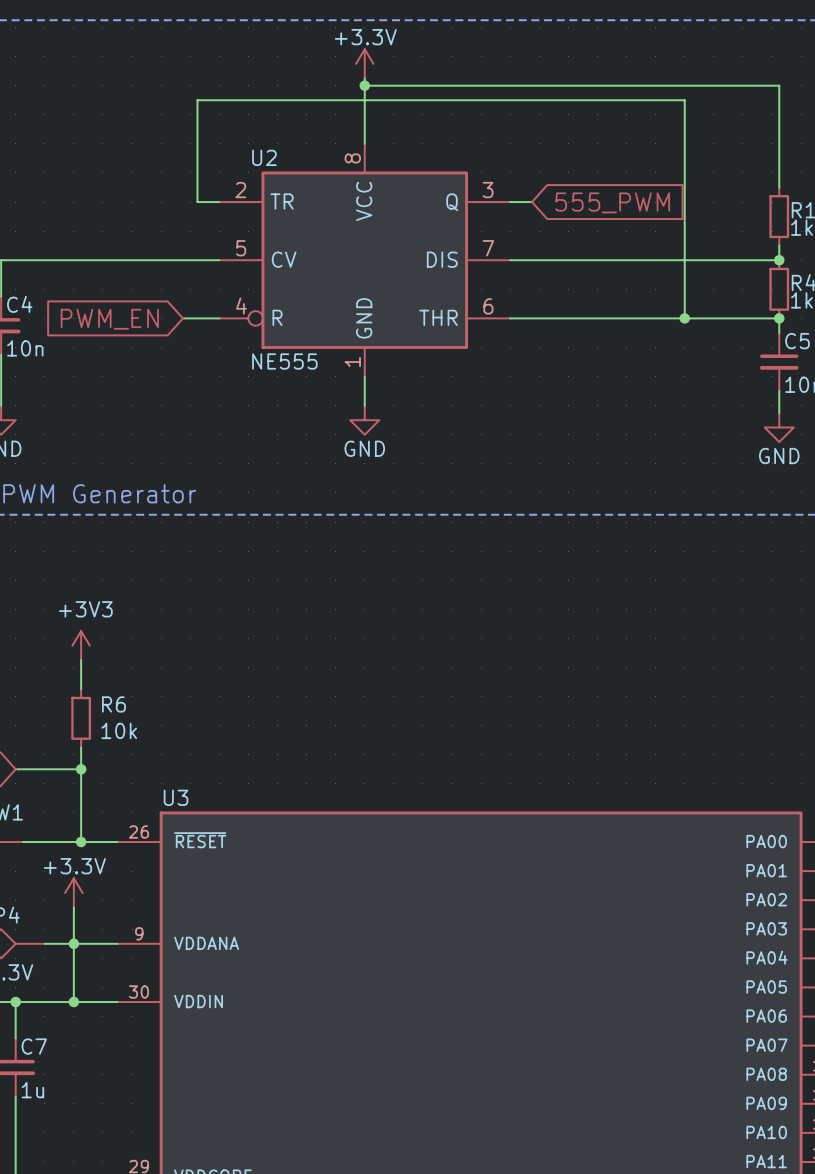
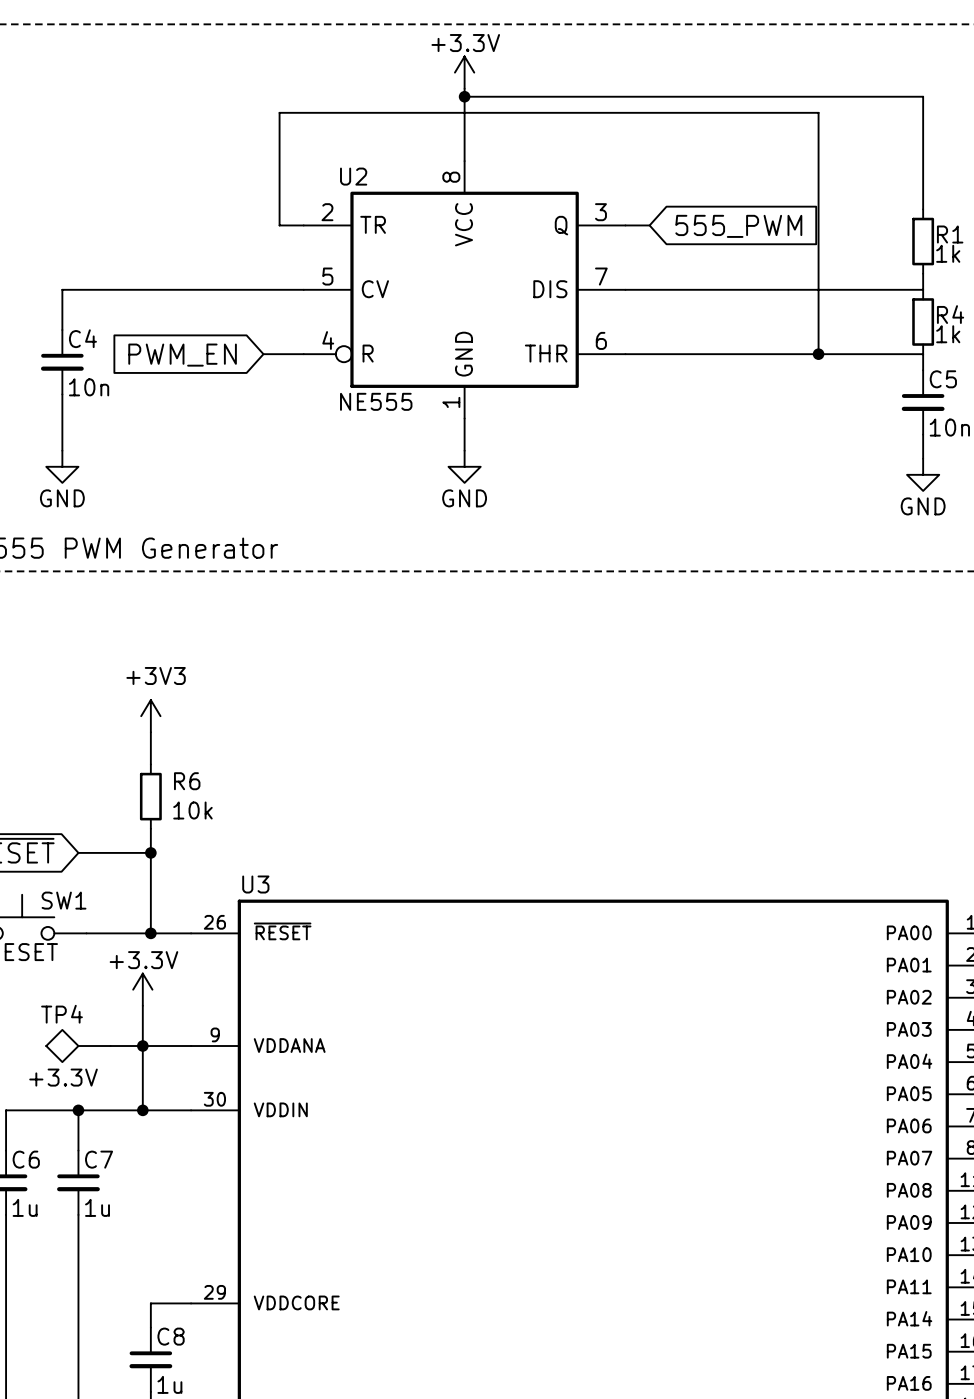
junction: (779, 260) -> none
junction: (779, 318) -> none

